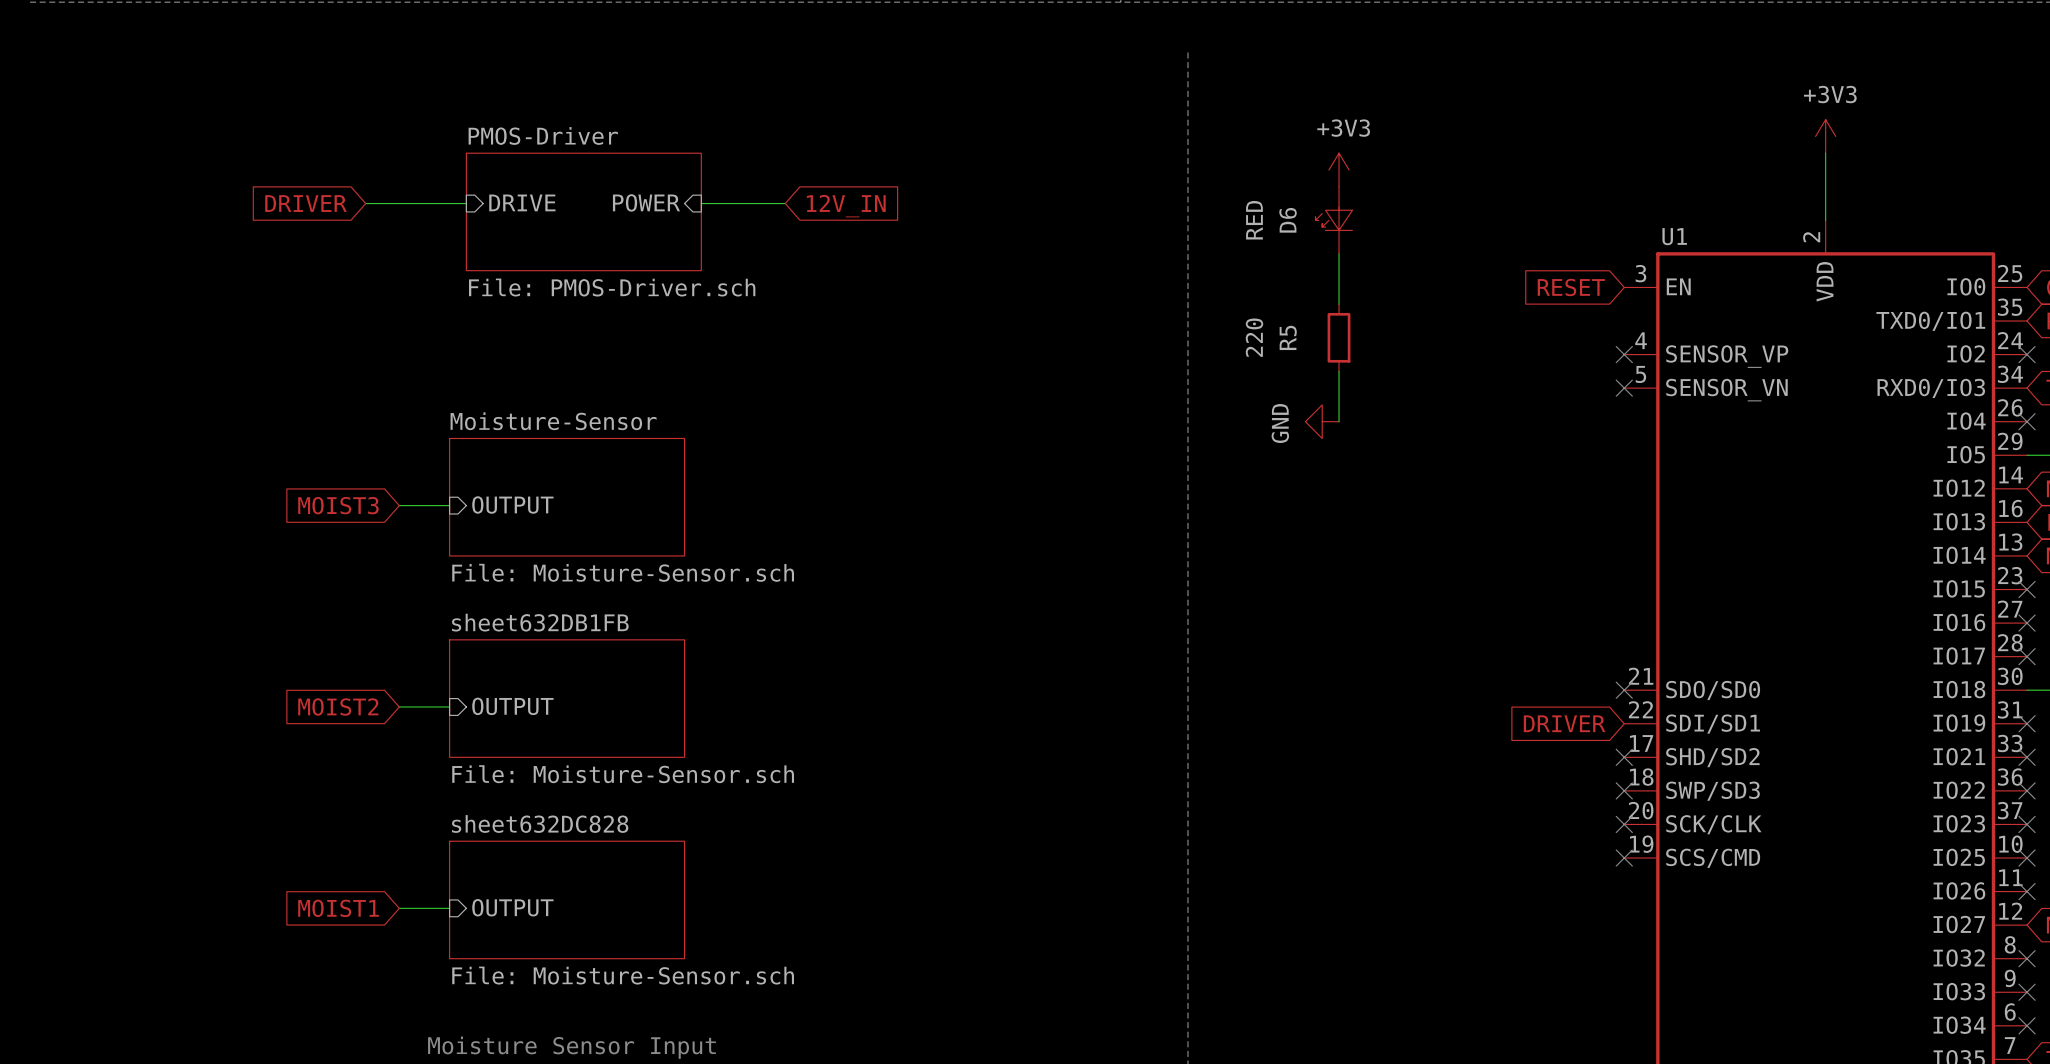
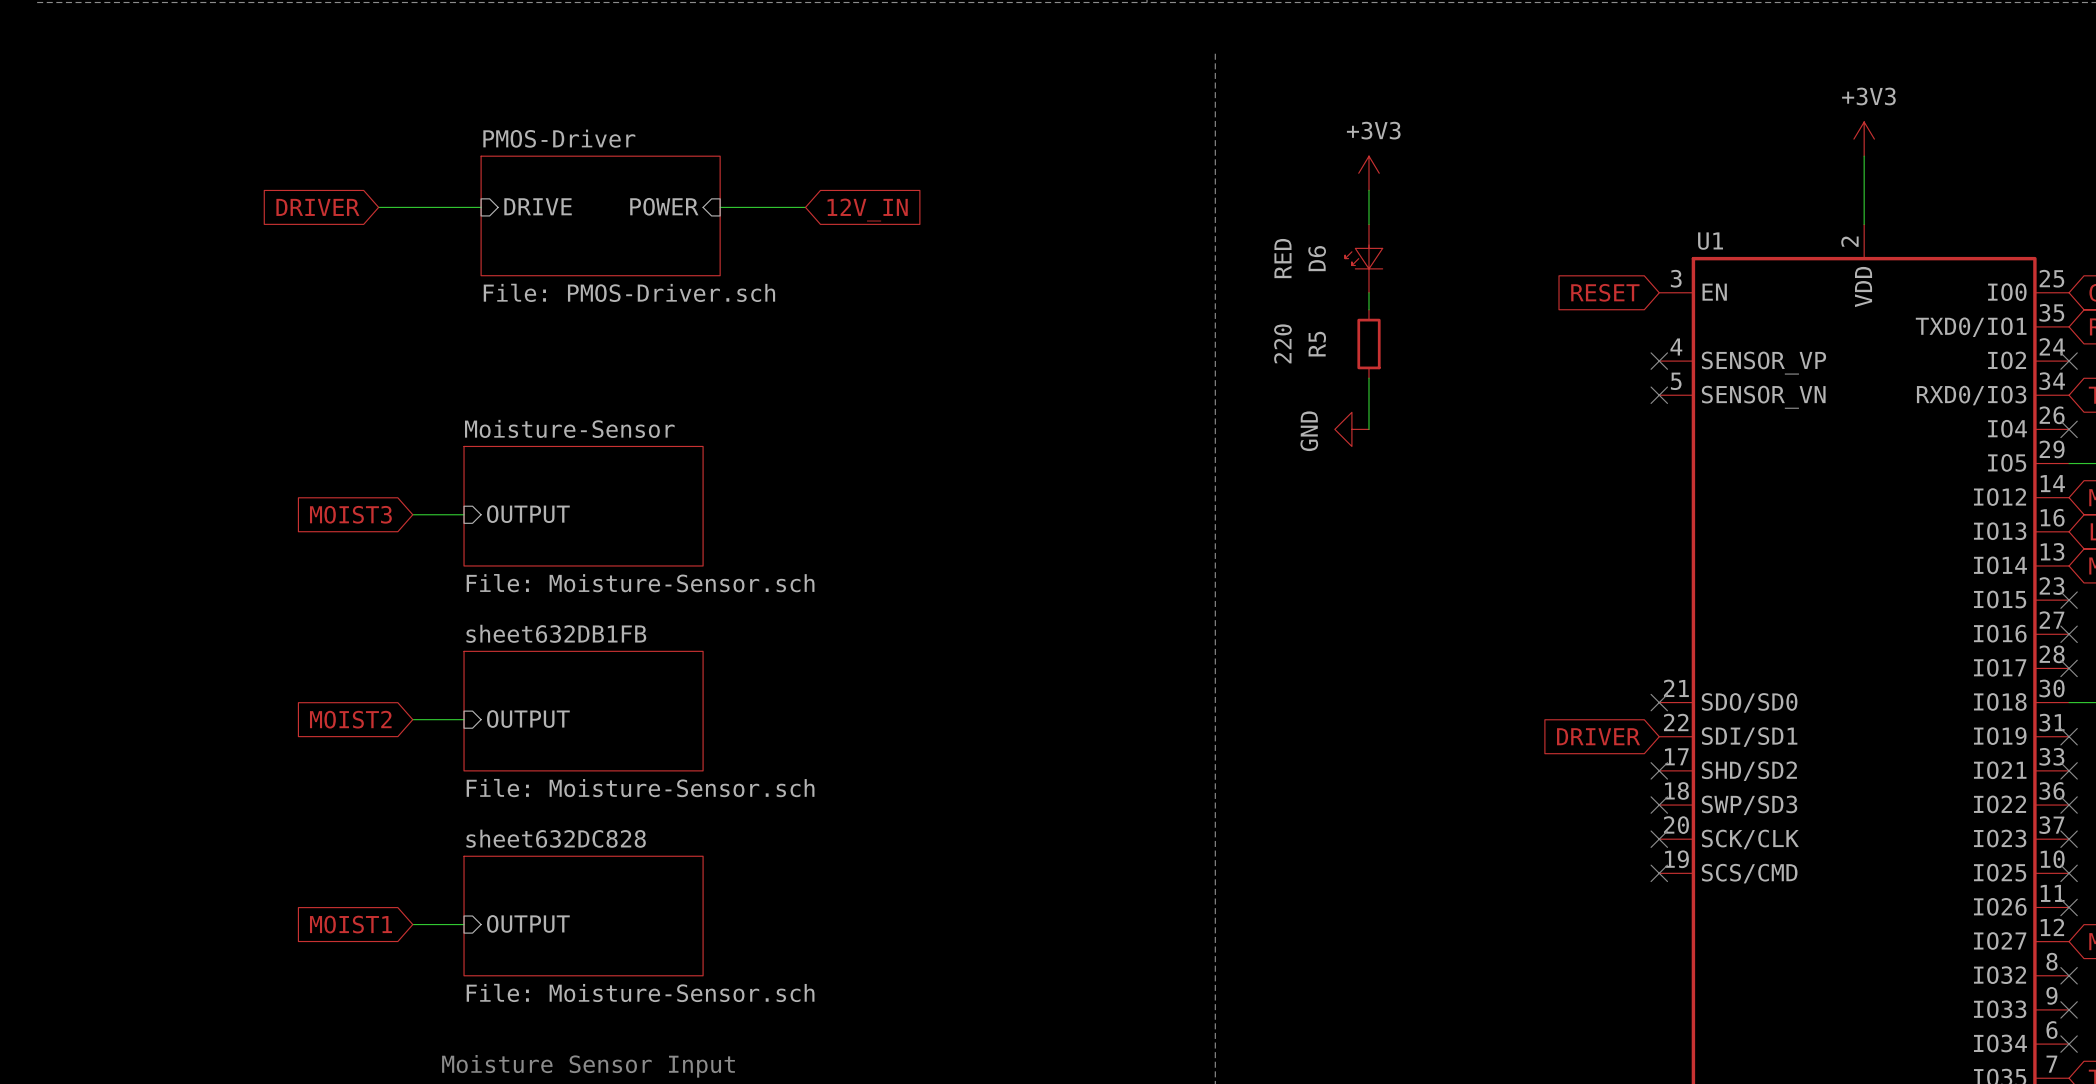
D6 position: (1333, 220) -> (1363, 258)

